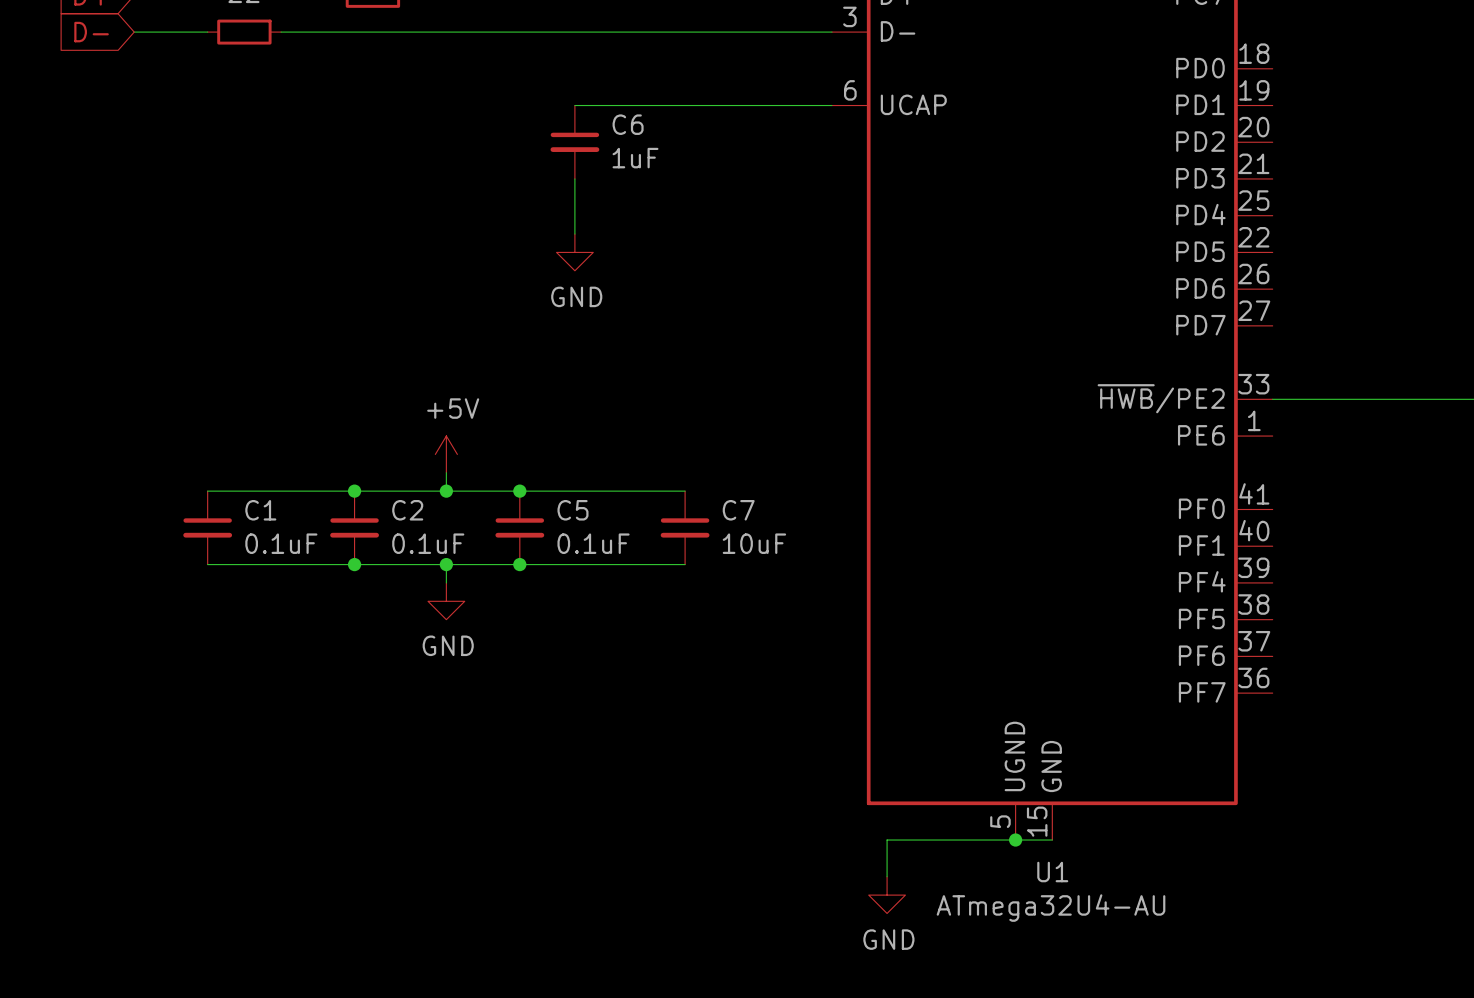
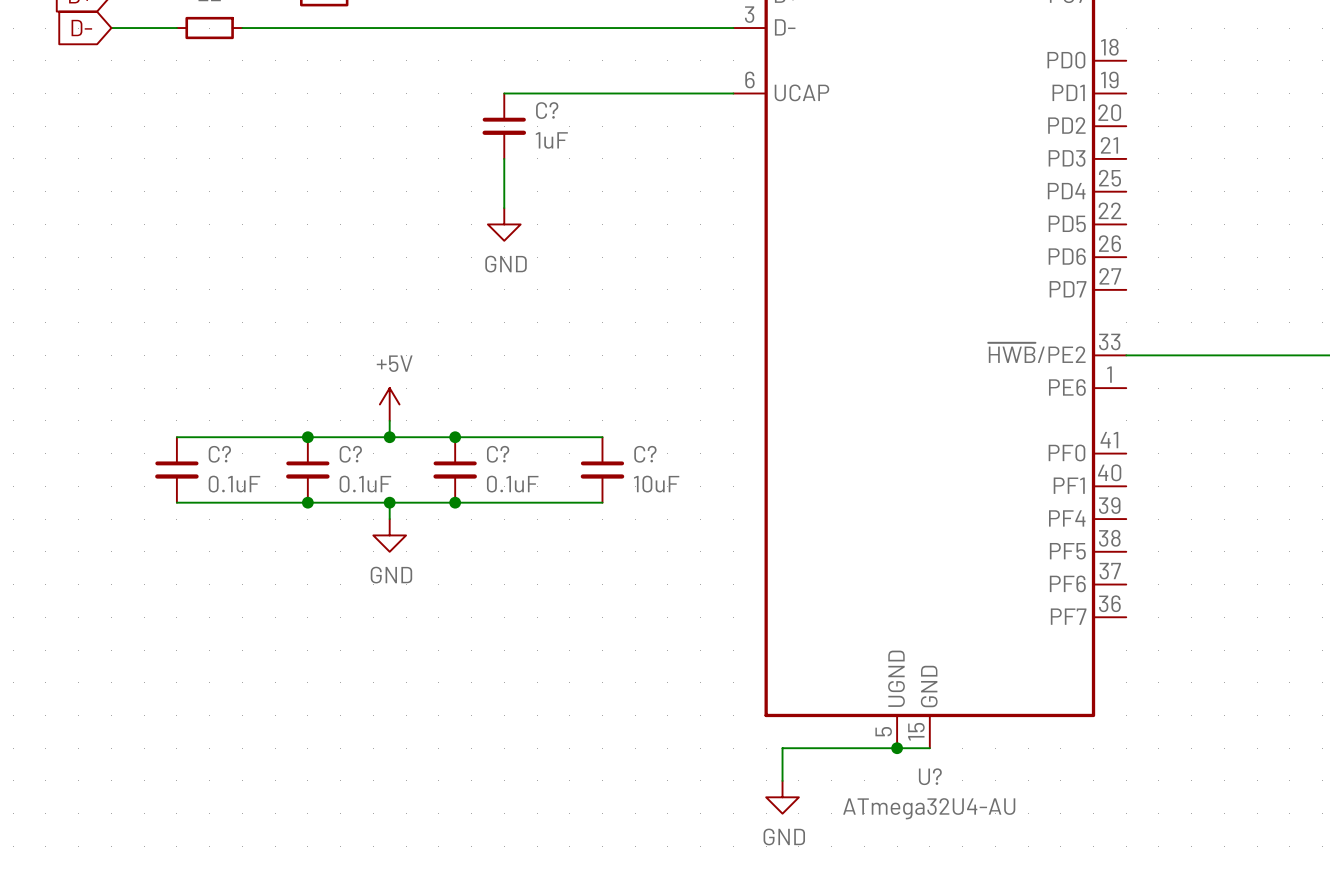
C6 name: C6 (628, 124) -> C? (547, 110)
C1 name: C1 (260, 510) -> C? (219, 454)
C2 name: C2 (407, 510) -> C? (350, 454)
C5 name: C5 (572, 510) -> C? (498, 454)
C7 name: C7 (738, 510) -> C? (645, 454)
U1 name: U1 (1052, 872) -> U? (930, 776)

